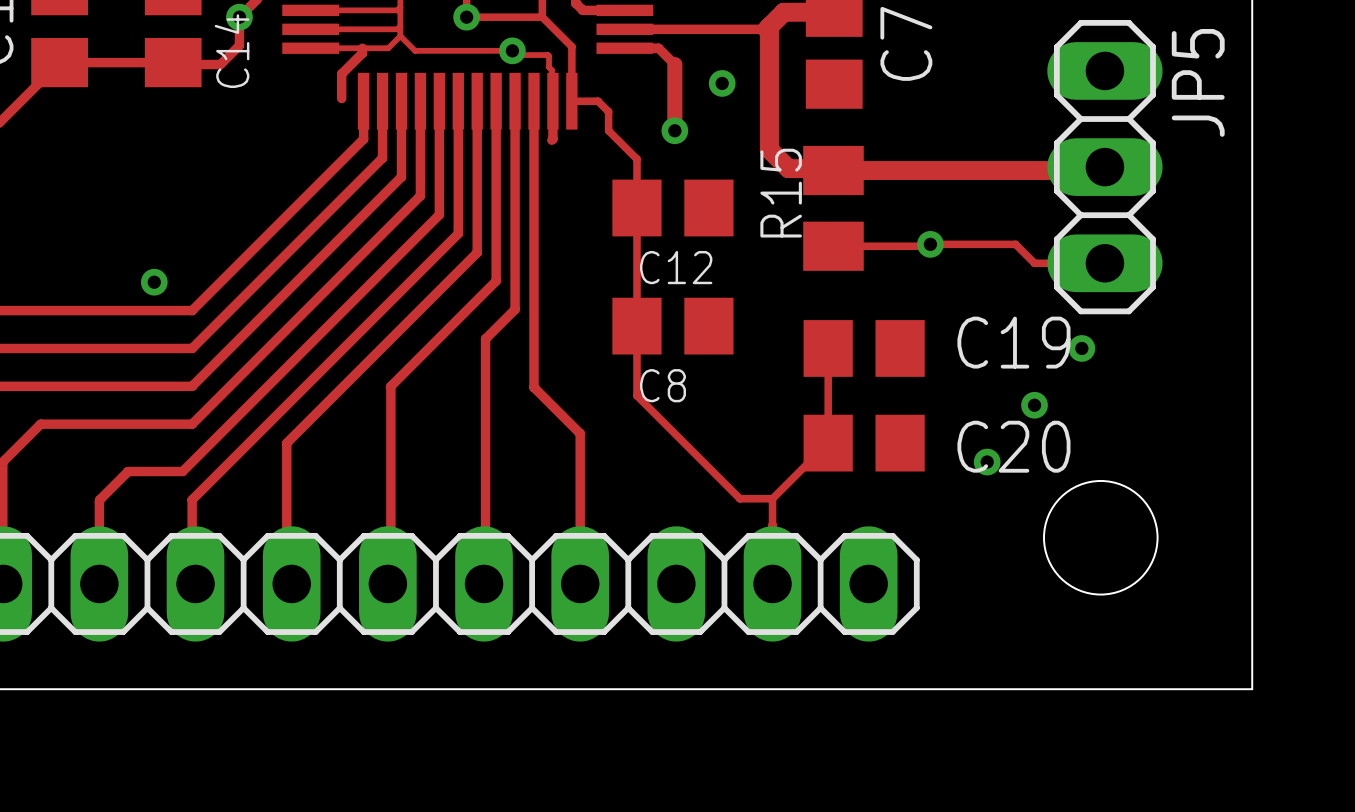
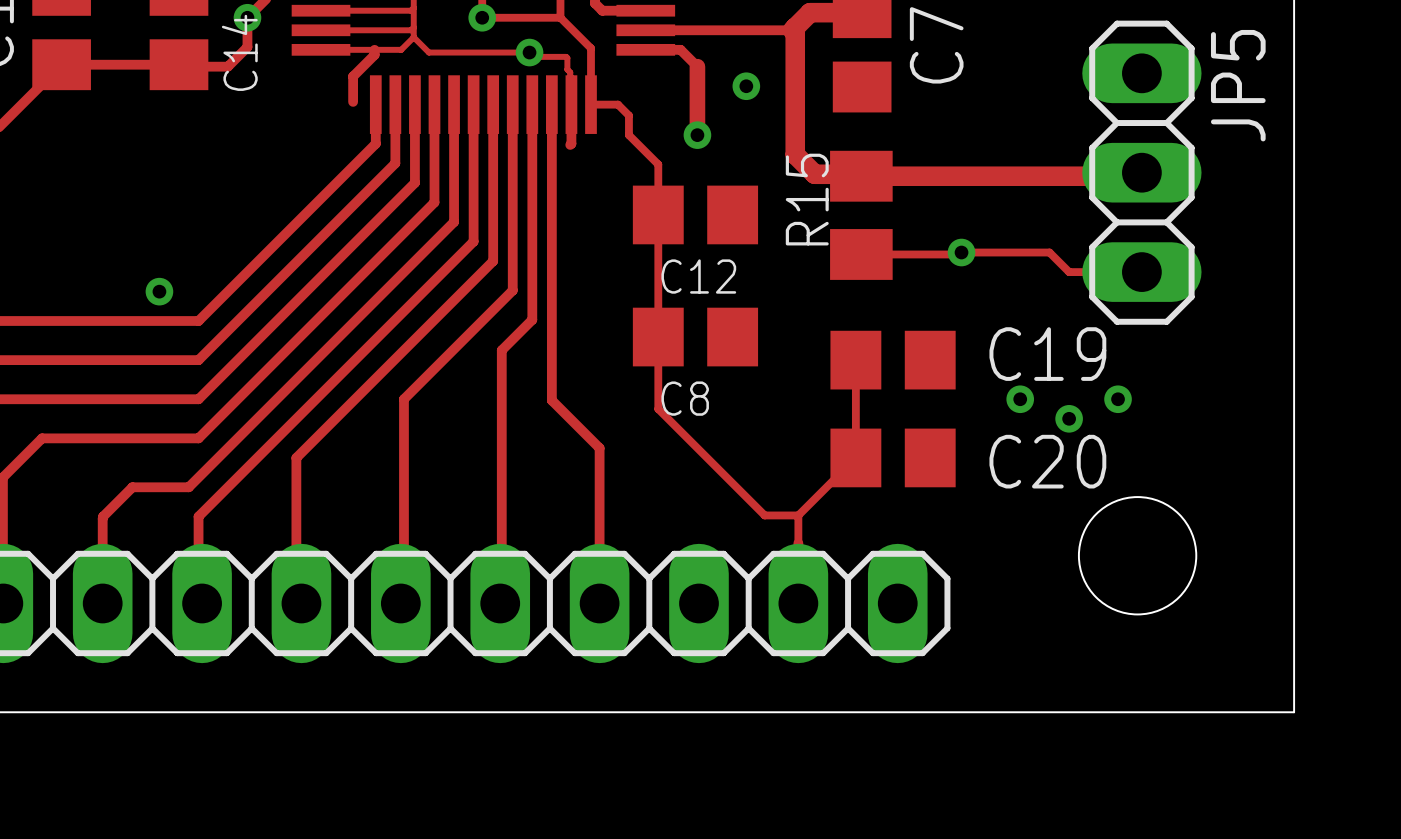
via position: (1081, 348) -> (1118, 399)
via: none -> (1020, 399)
via: (987, 462) -> none

